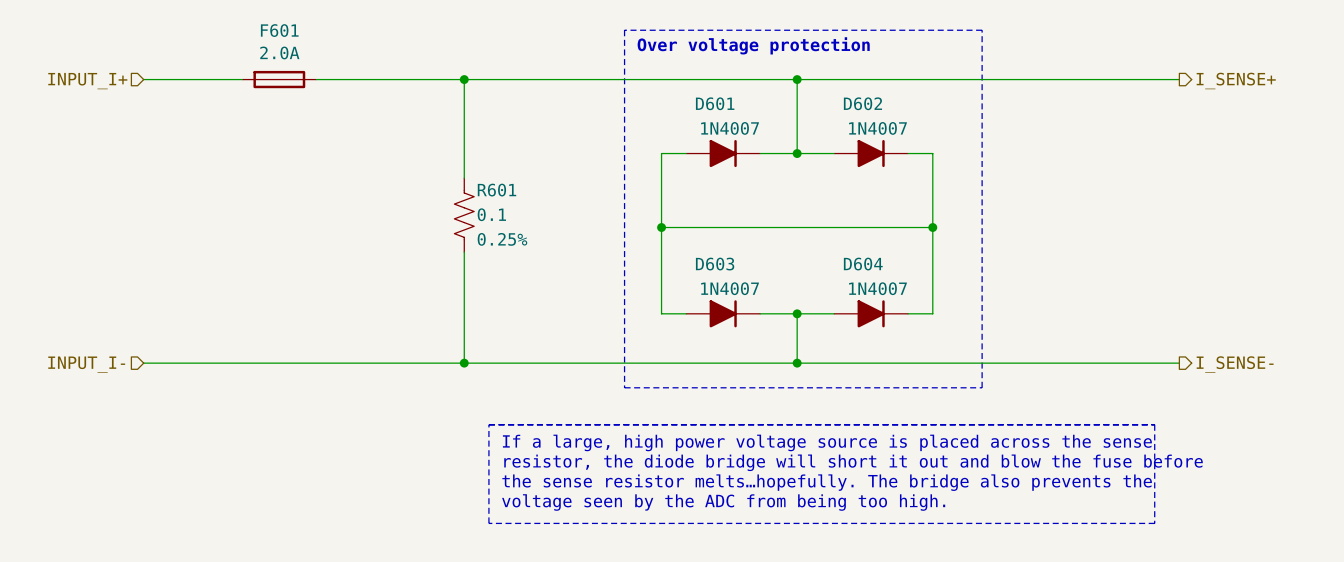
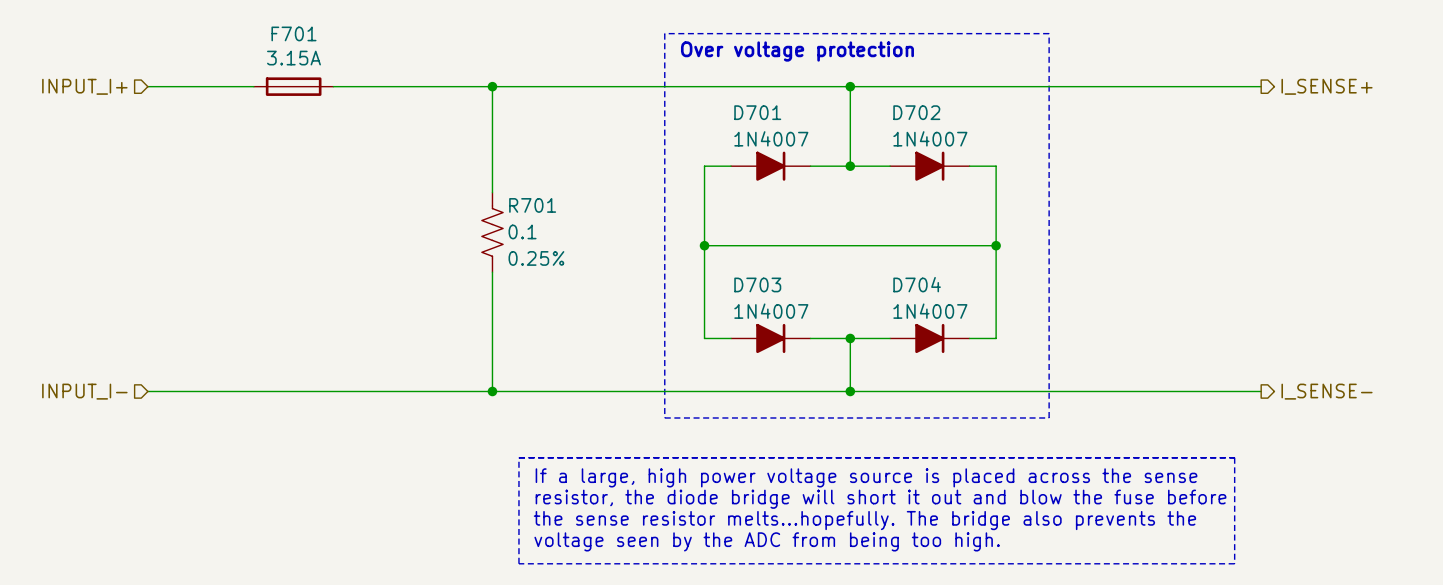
F601 name: F601 (279, 30) -> F701 (293, 33)
F601 value: 2.0A (279, 52) -> 3.15A (293, 58)
D601 name: D601 (715, 103) -> D701 (757, 112)
D602 name: D602 (862, 103) -> D702 (916, 112)
R601 name: R601 (496, 190) -> R701 (532, 205)
D603 name: D603 (715, 264) -> D703 (757, 284)
D604 name: D604 (863, 264) -> D704 (917, 284)

